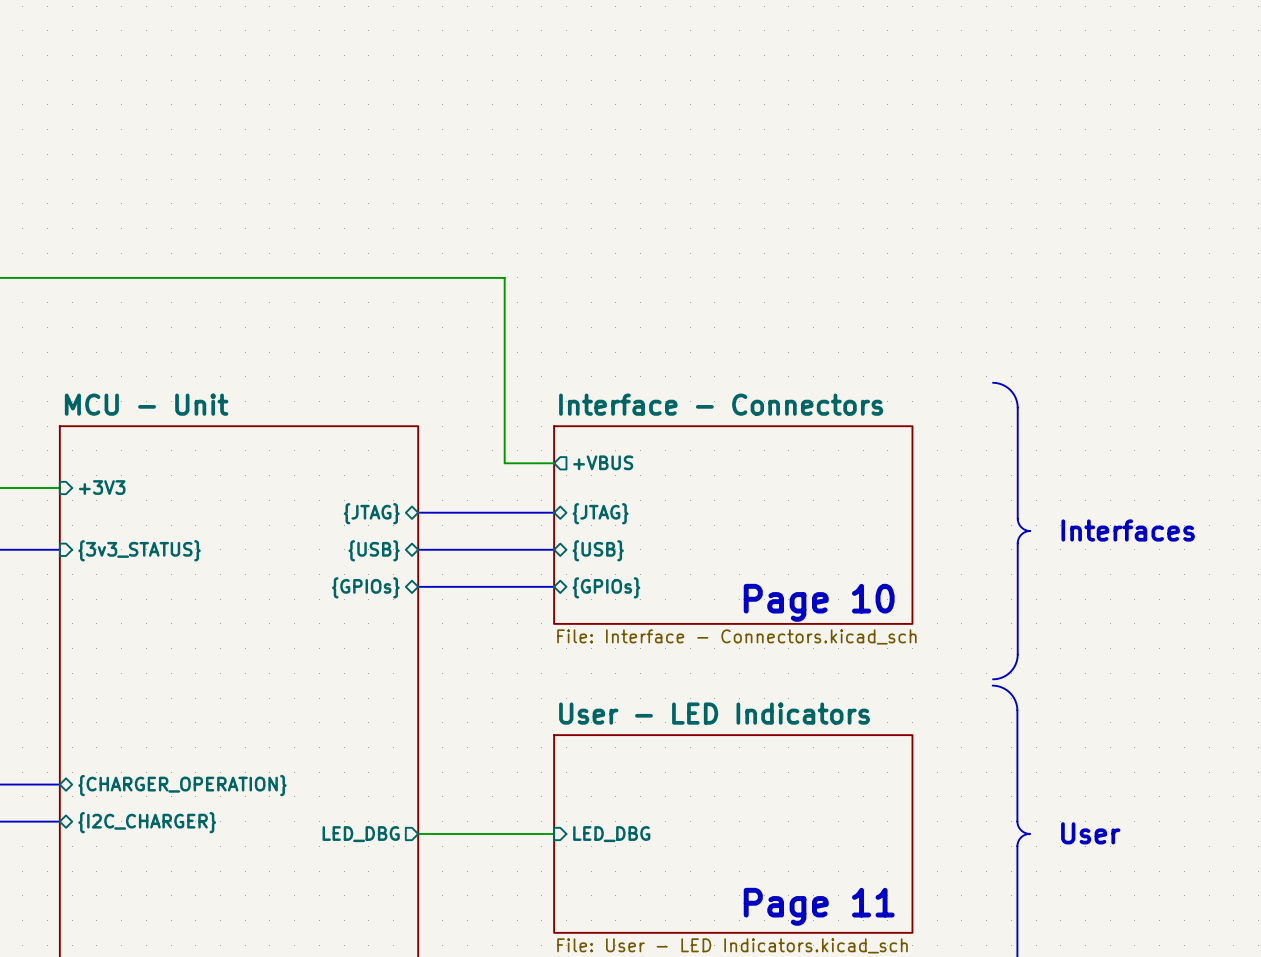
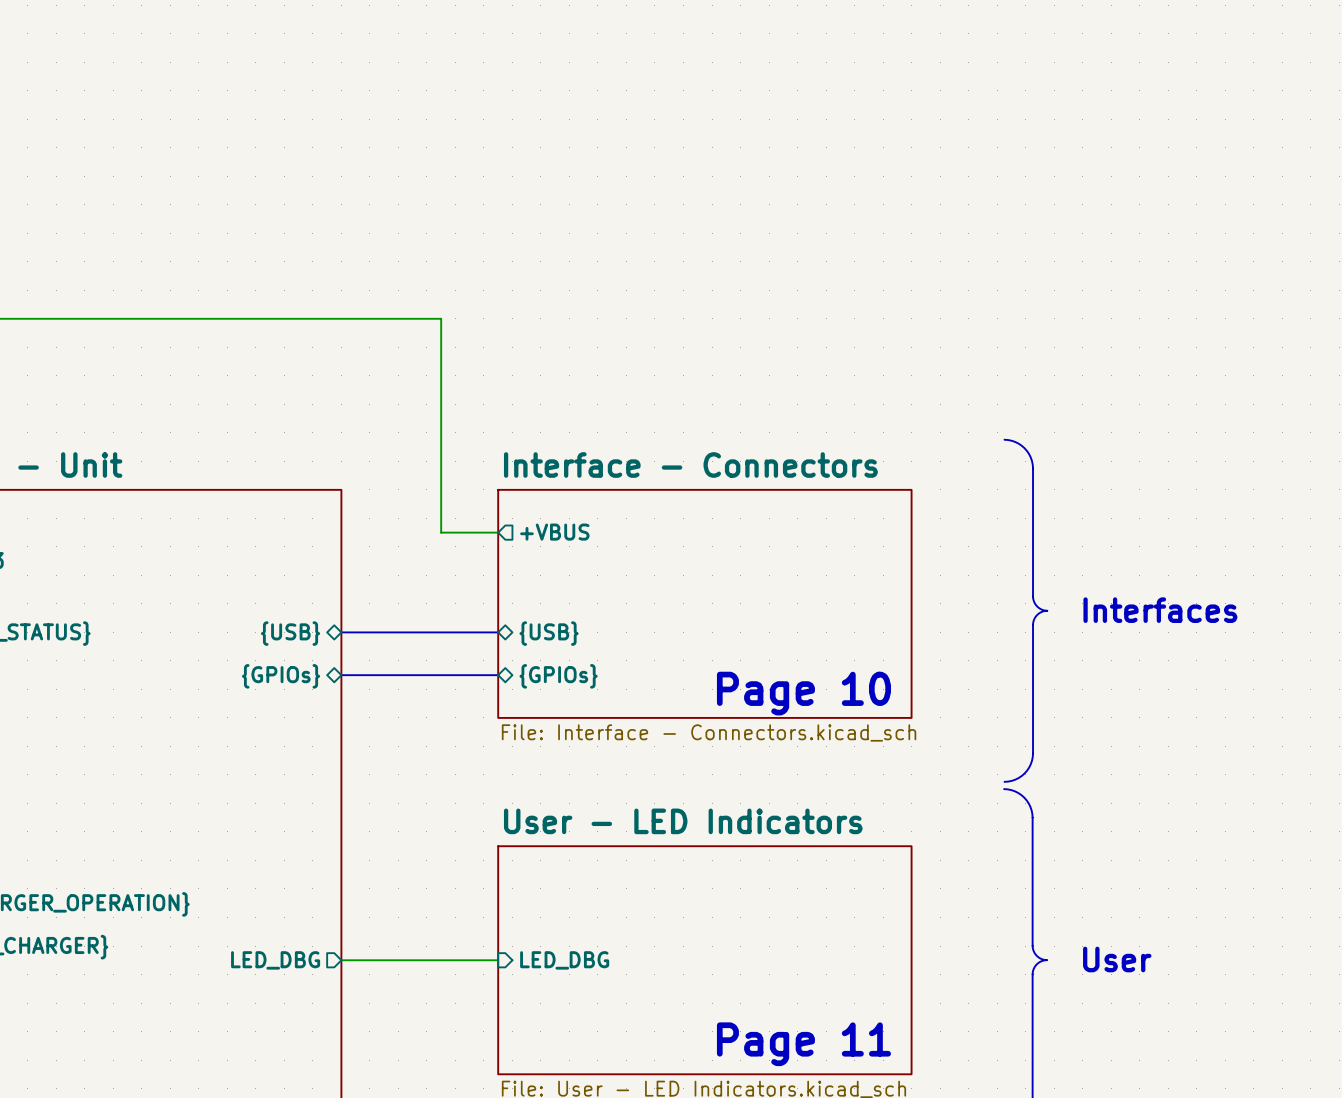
bus: (418, 512) (554, 512) -> none
sheet pin: {JTAG} (371, 513) -> none
sheet pin: {JTAG} (600, 513) -> none

